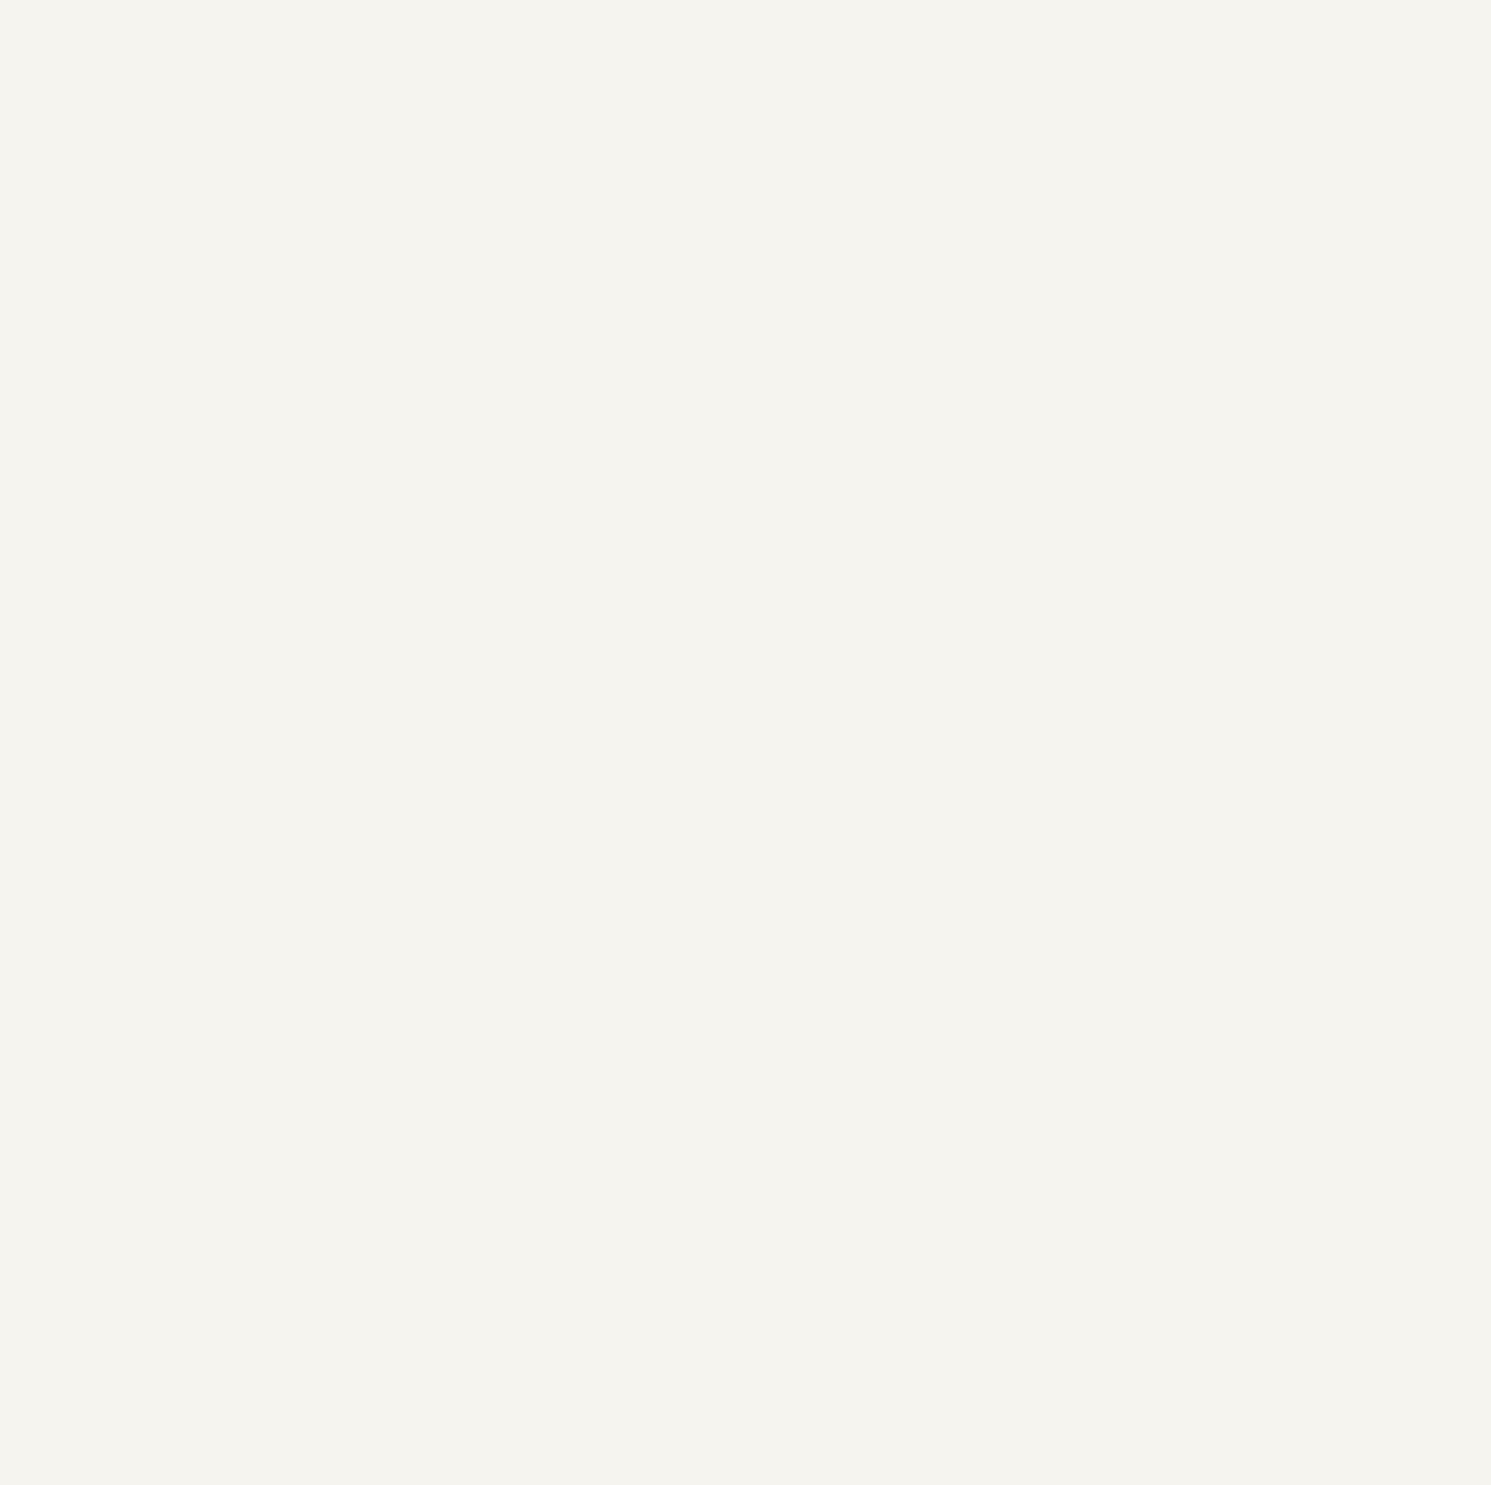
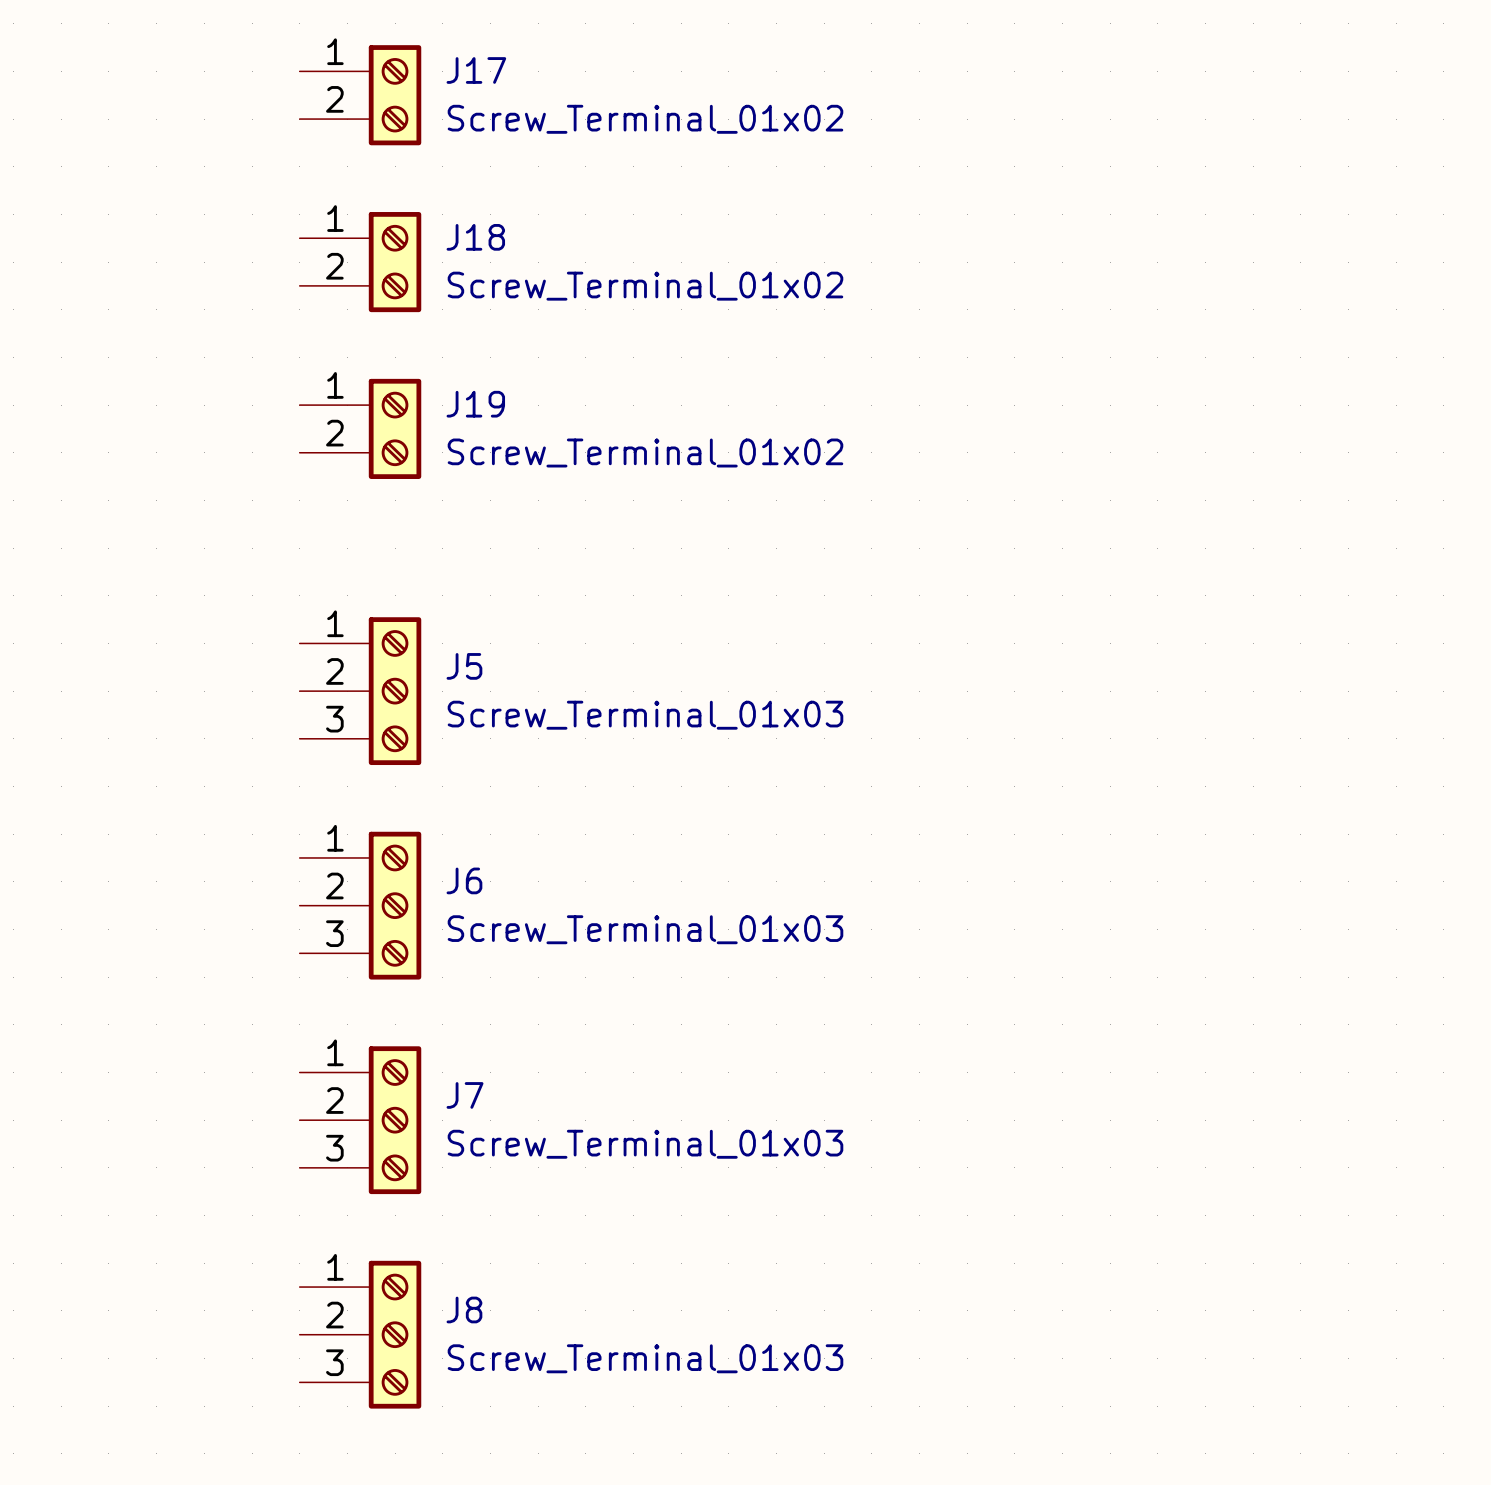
J17: none -> Screw_Terminal_01x02 (360, 95)
J18: none -> Screw_Terminal_01x02 (360, 262)
J19: none -> Screw_Terminal_01x02 (360, 428)
J5: none -> Screw_Terminal_01x03 (360, 691)
J6: none -> Screw_Terminal_01x03 (360, 905)
J7: none -> Screw_Terminal_01x03 (360, 1120)
J8: none -> Screw_Terminal_01x03 (360, 1334)

